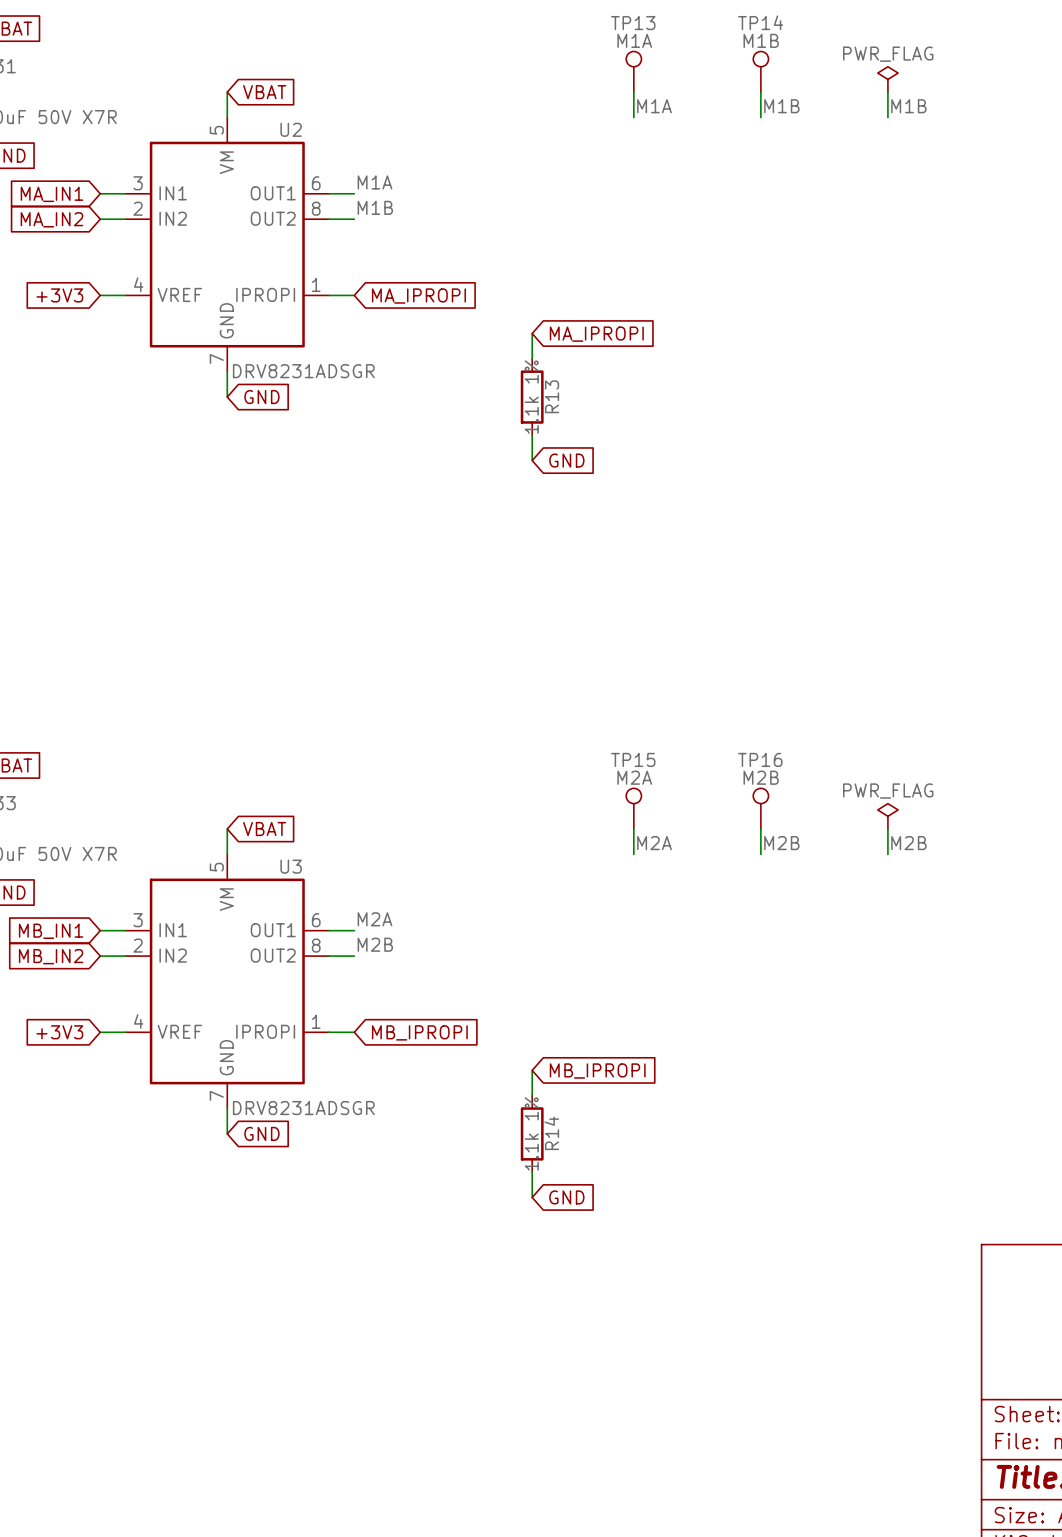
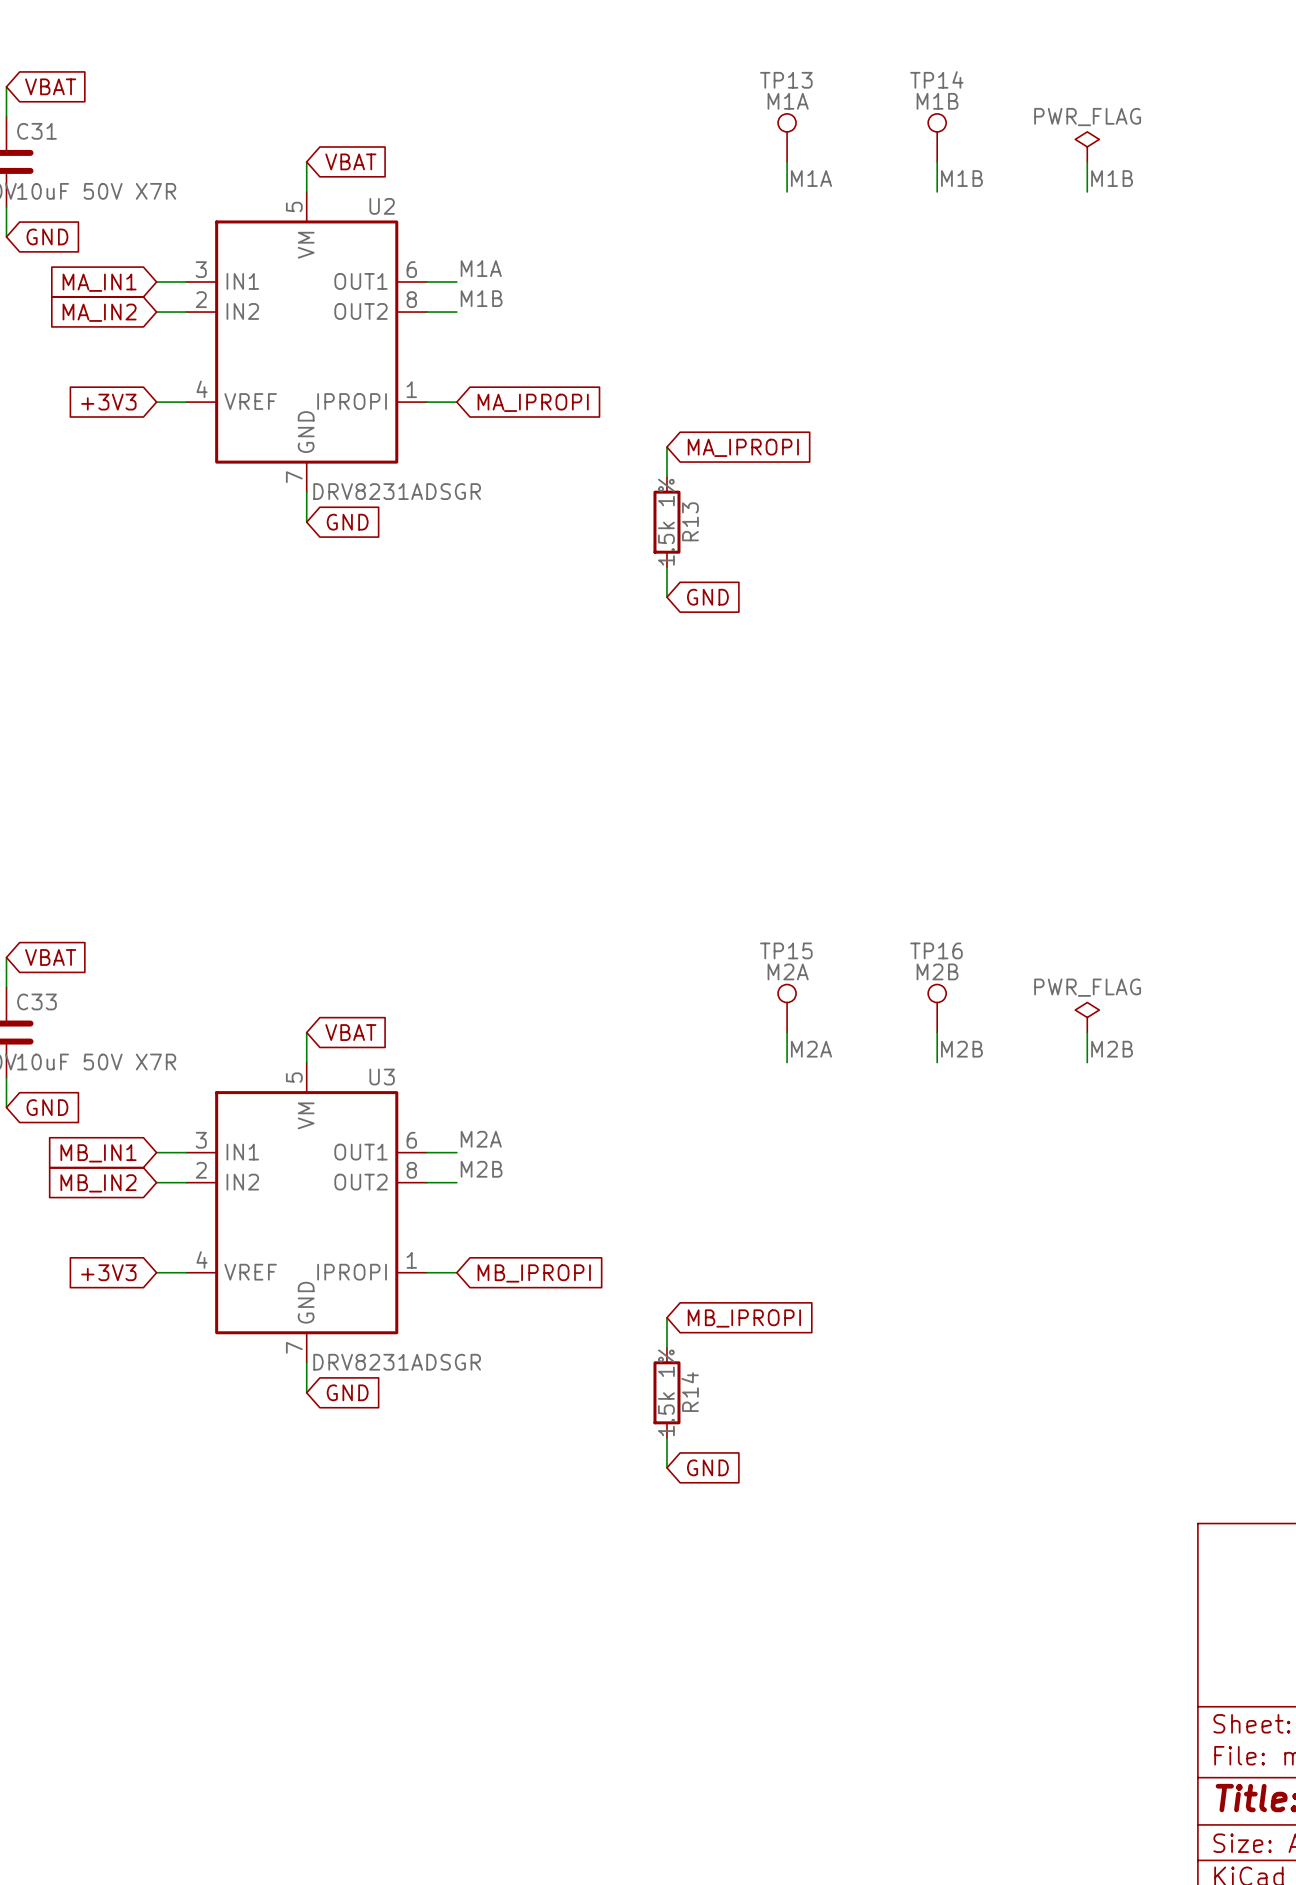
R13 value: 1.1k 1% (531, 397) -> 1.5k 1% (666, 522)
R14 value: 1.1k 1% (531, 1133) -> 1.5k 1% (666, 1392)

